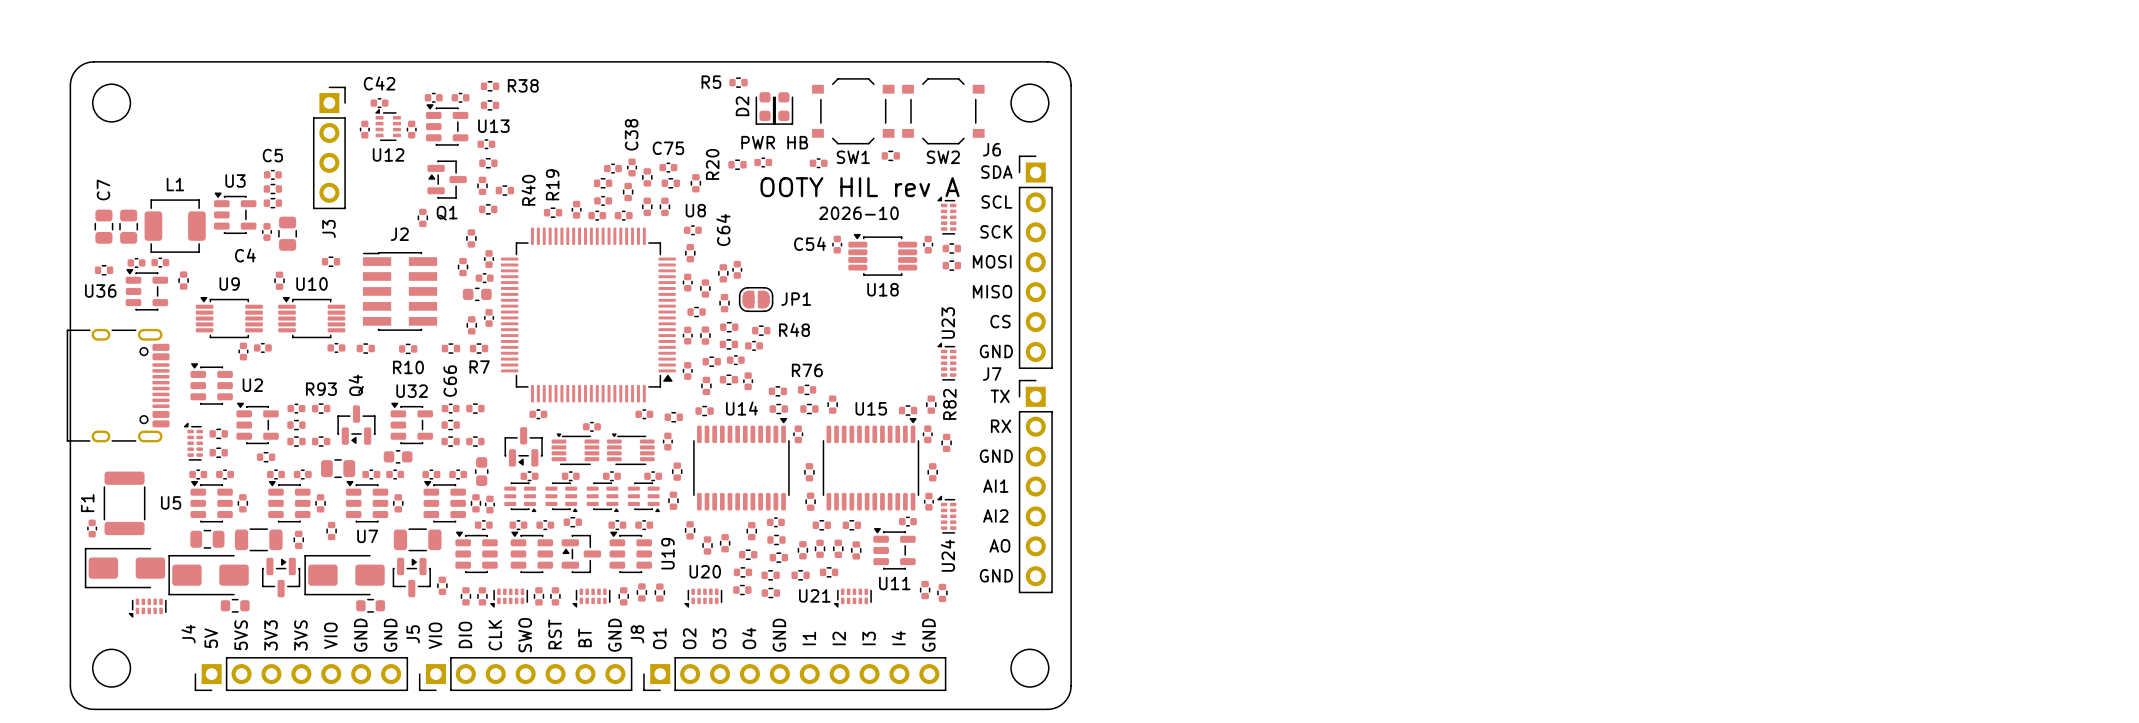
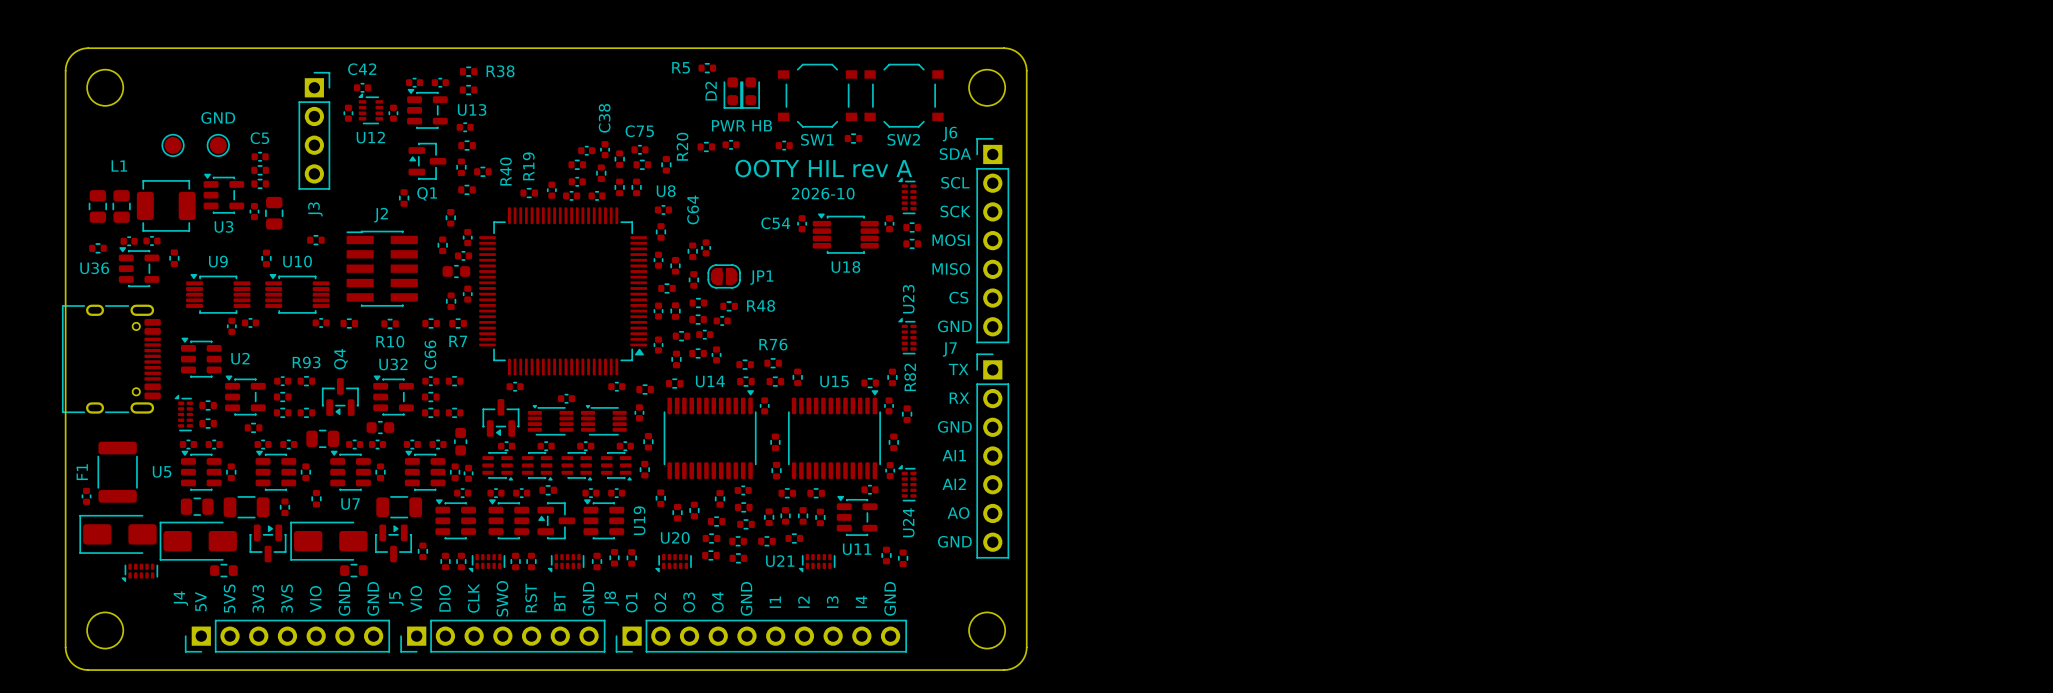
part: none -> (173, 145)
part: none -> GND (218, 145)
U3 name position: U3 (235, 180) -> U3 (223, 226)
L1 name position: L1 (175, 184) -> L1 (119, 166)
C7 name: C7 (103, 189) -> none
C4 name: C4 (245, 255) -> none

